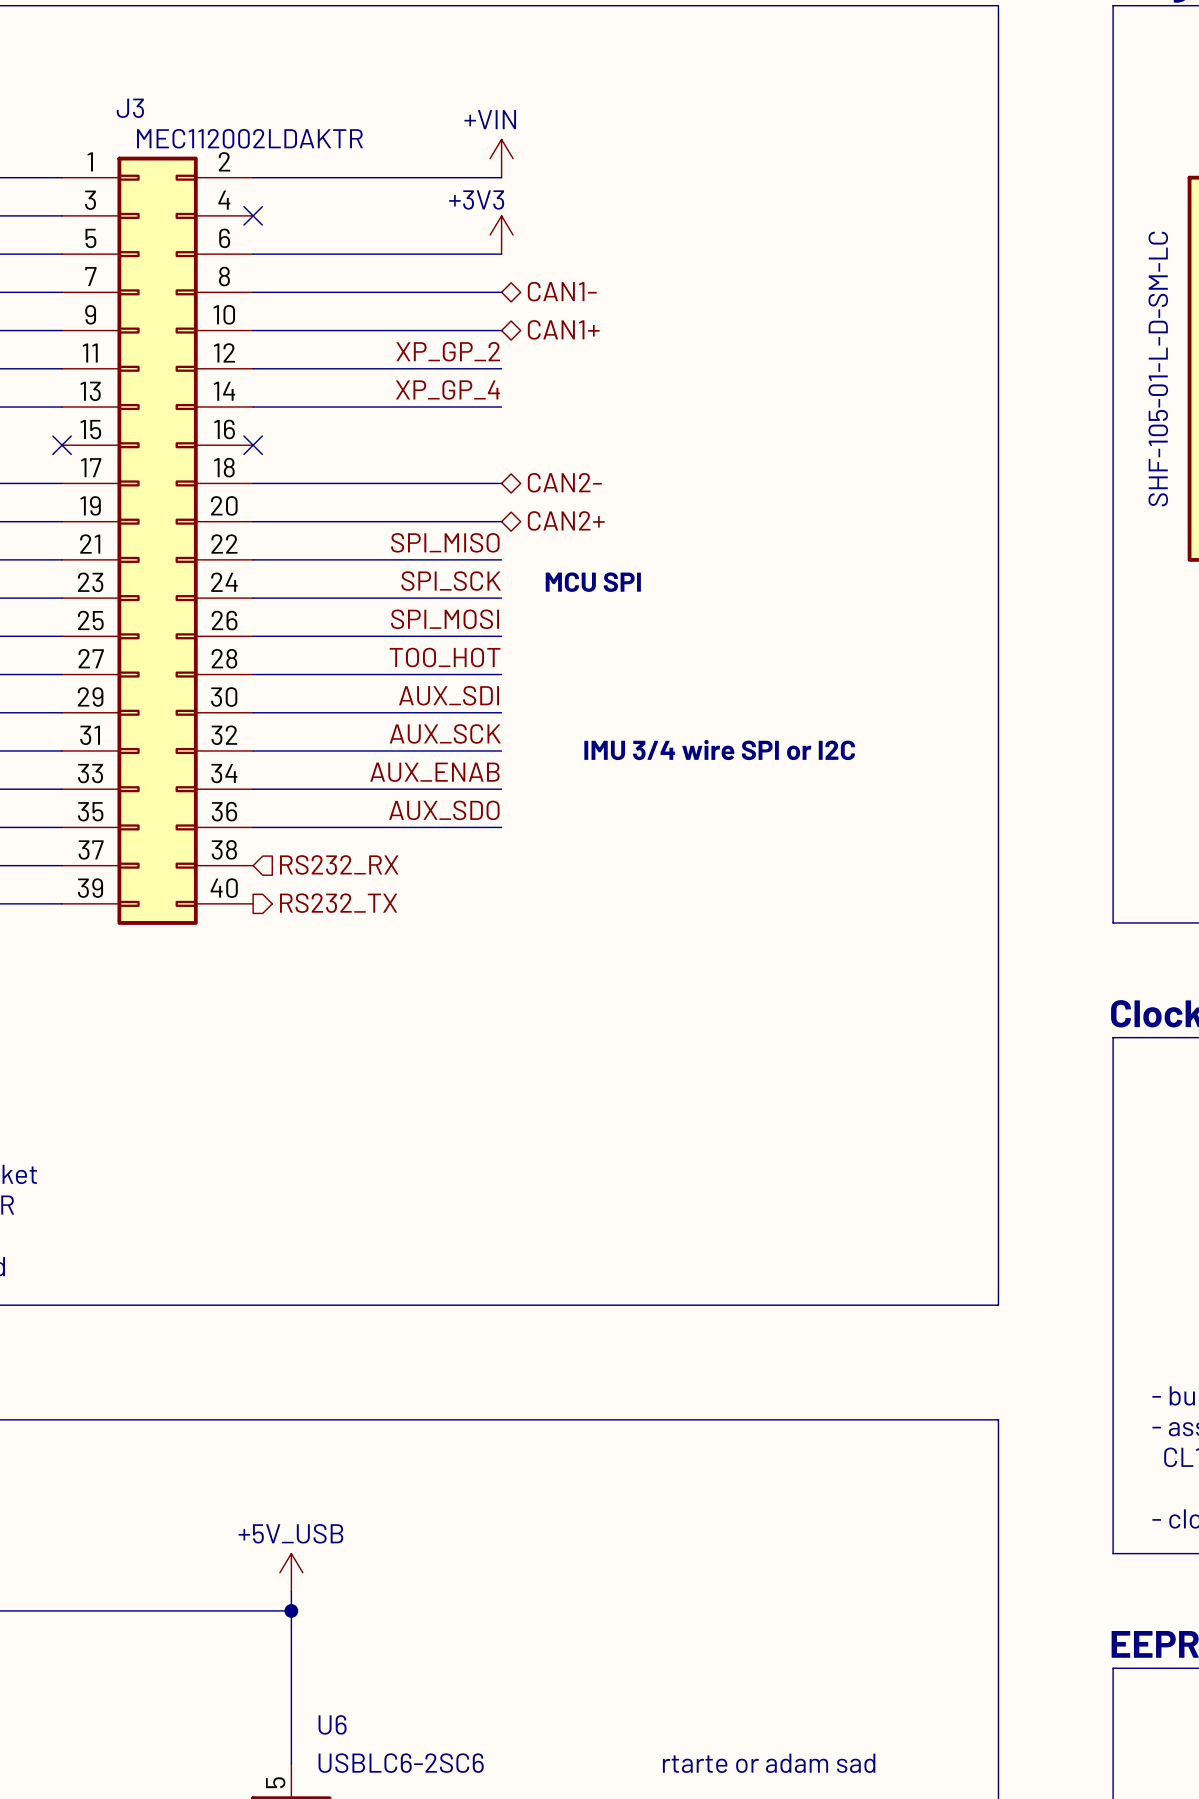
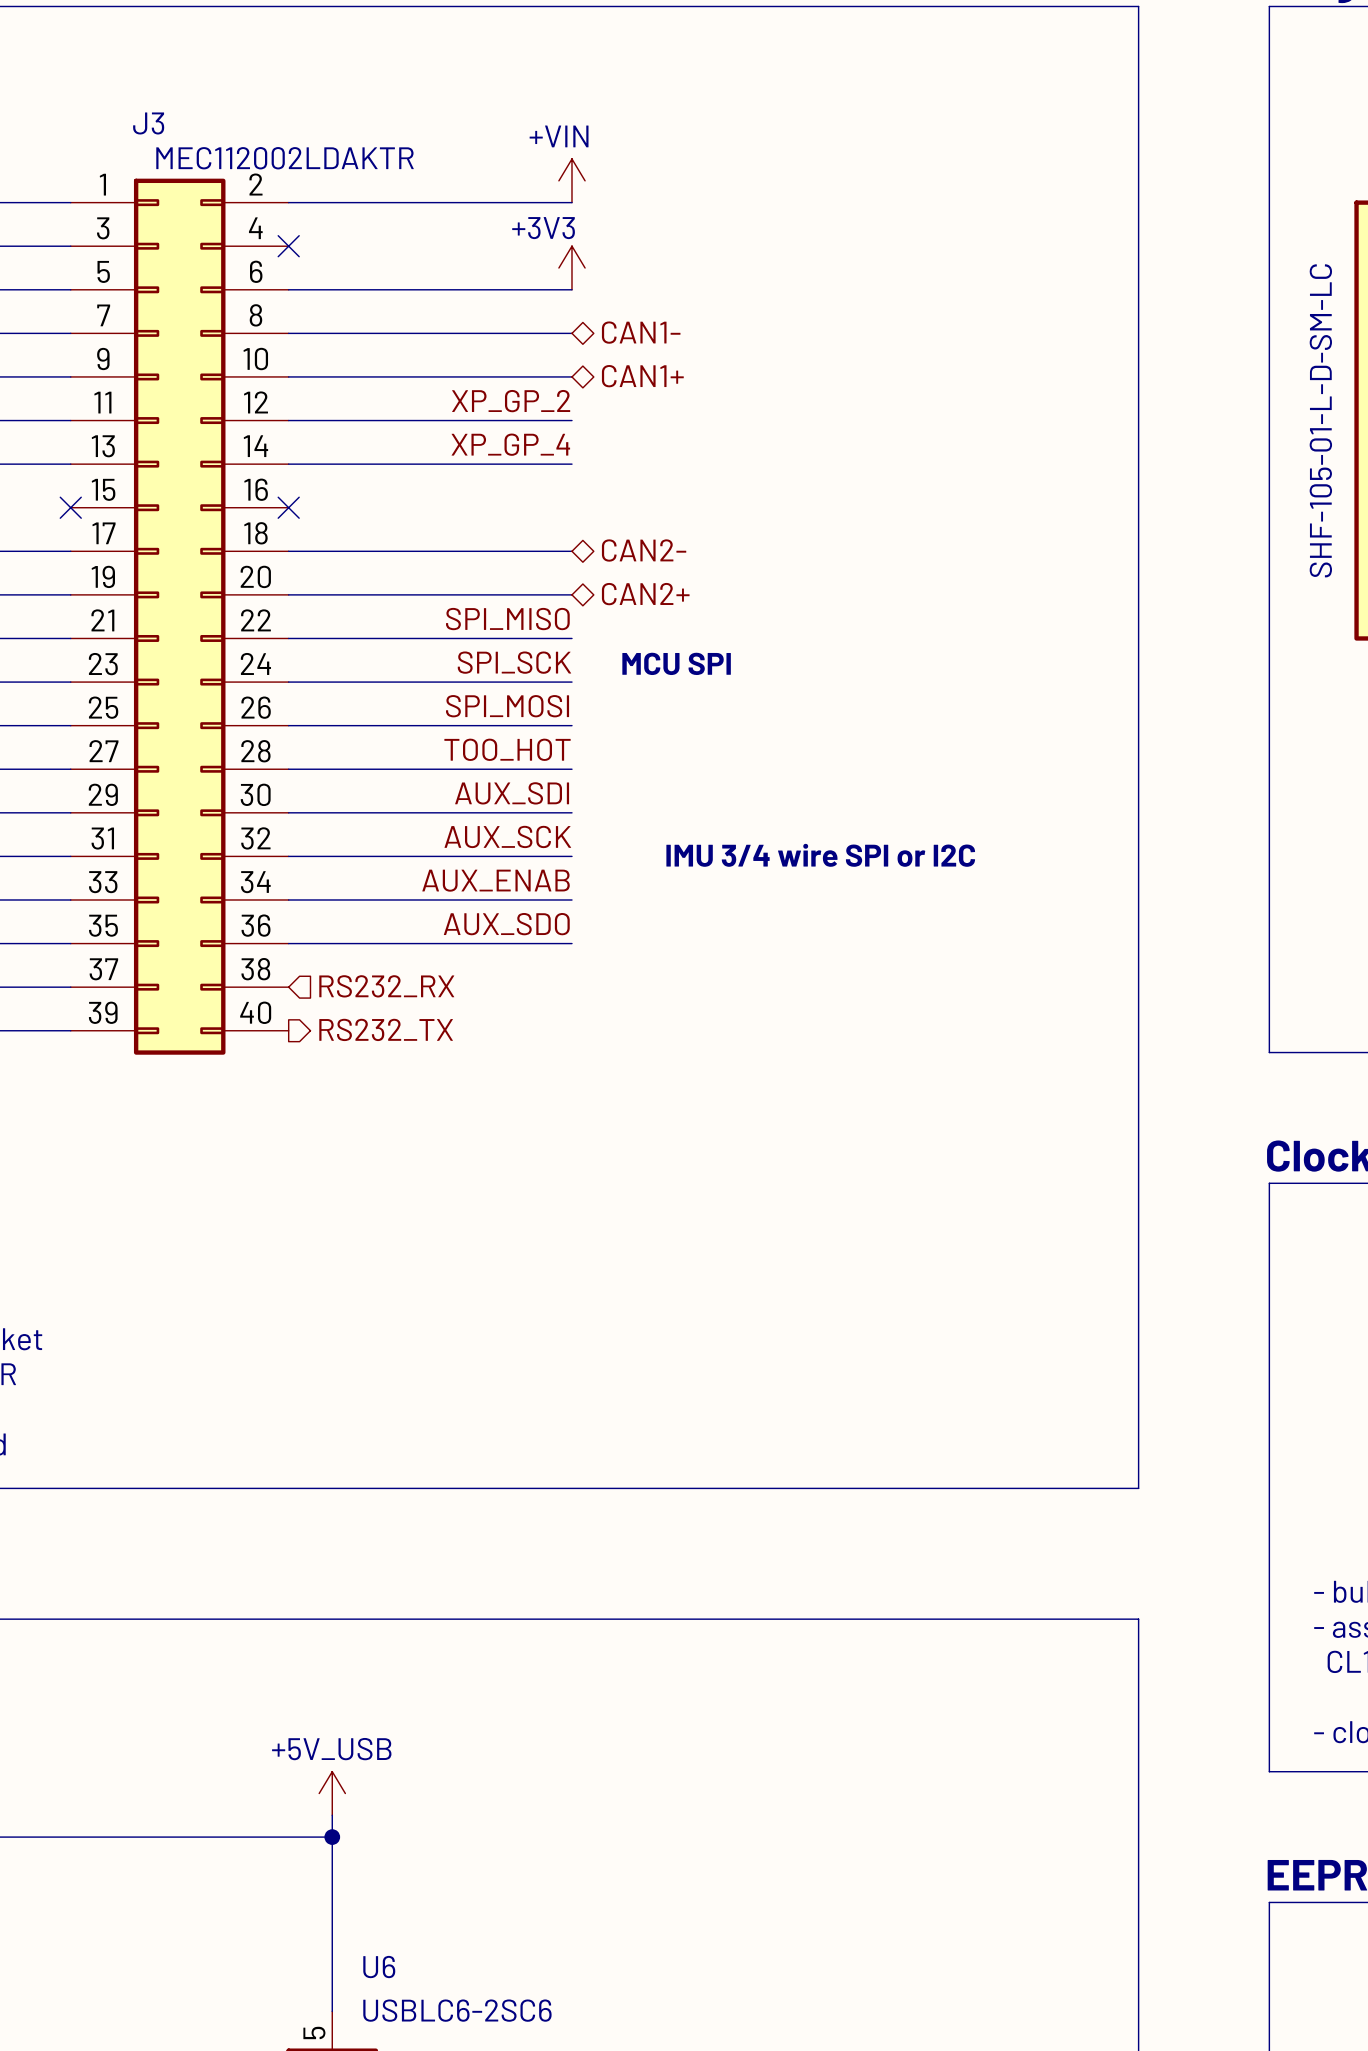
text: rtarte or adam sad (769, 1763) -> none

